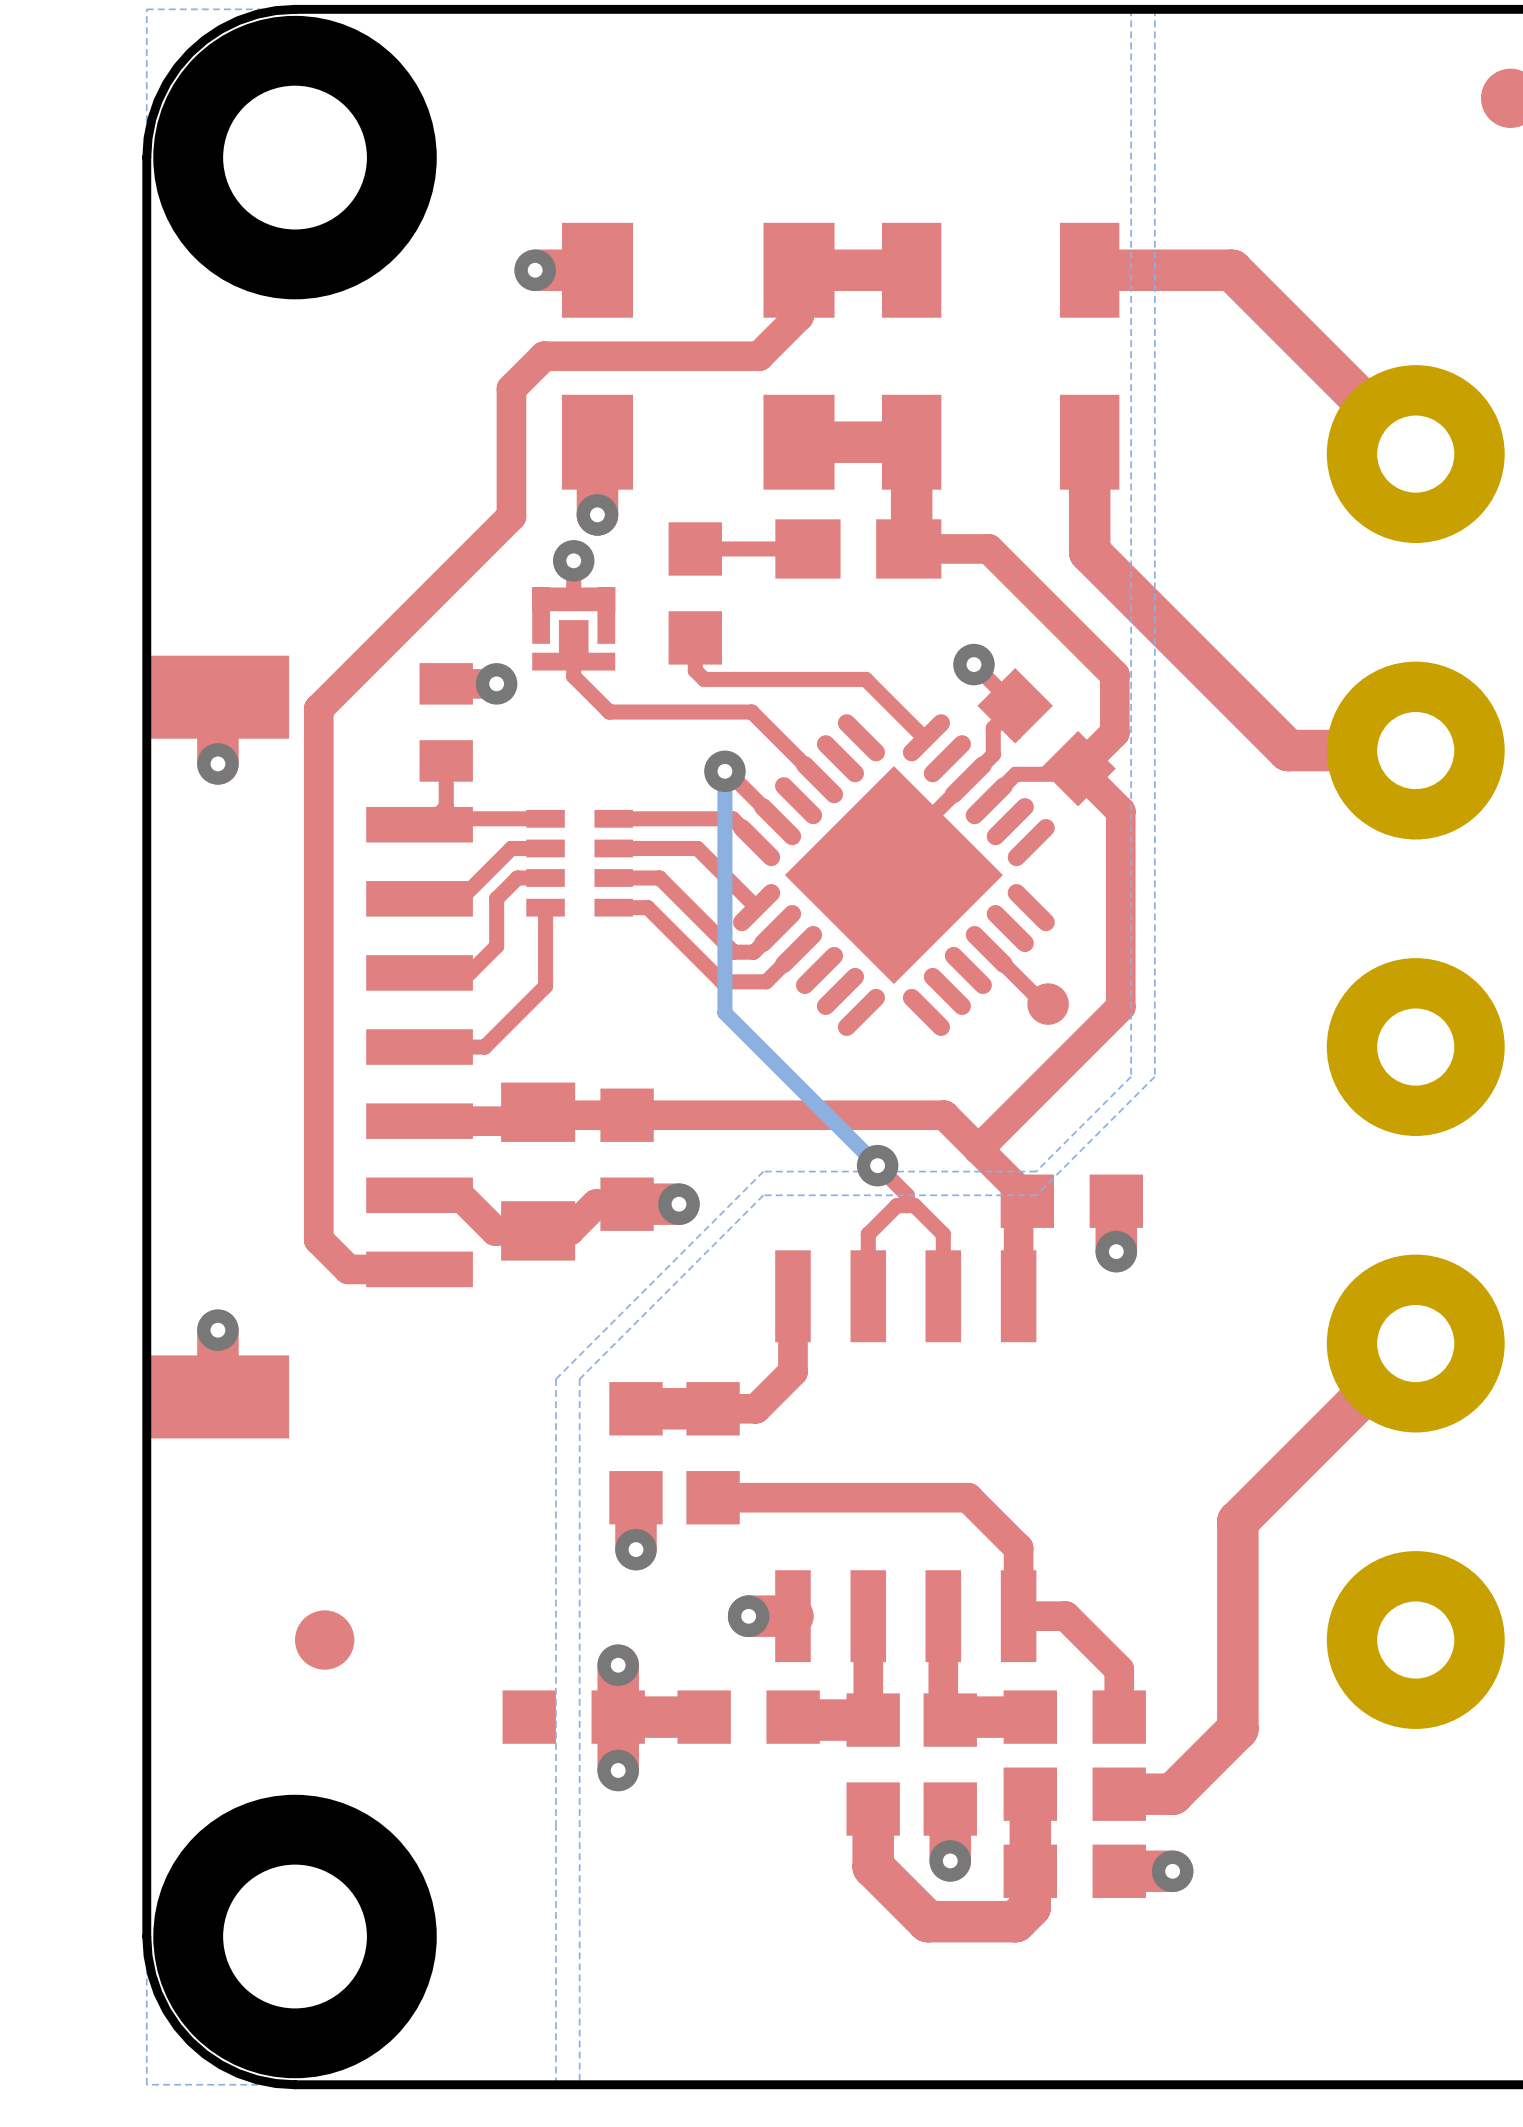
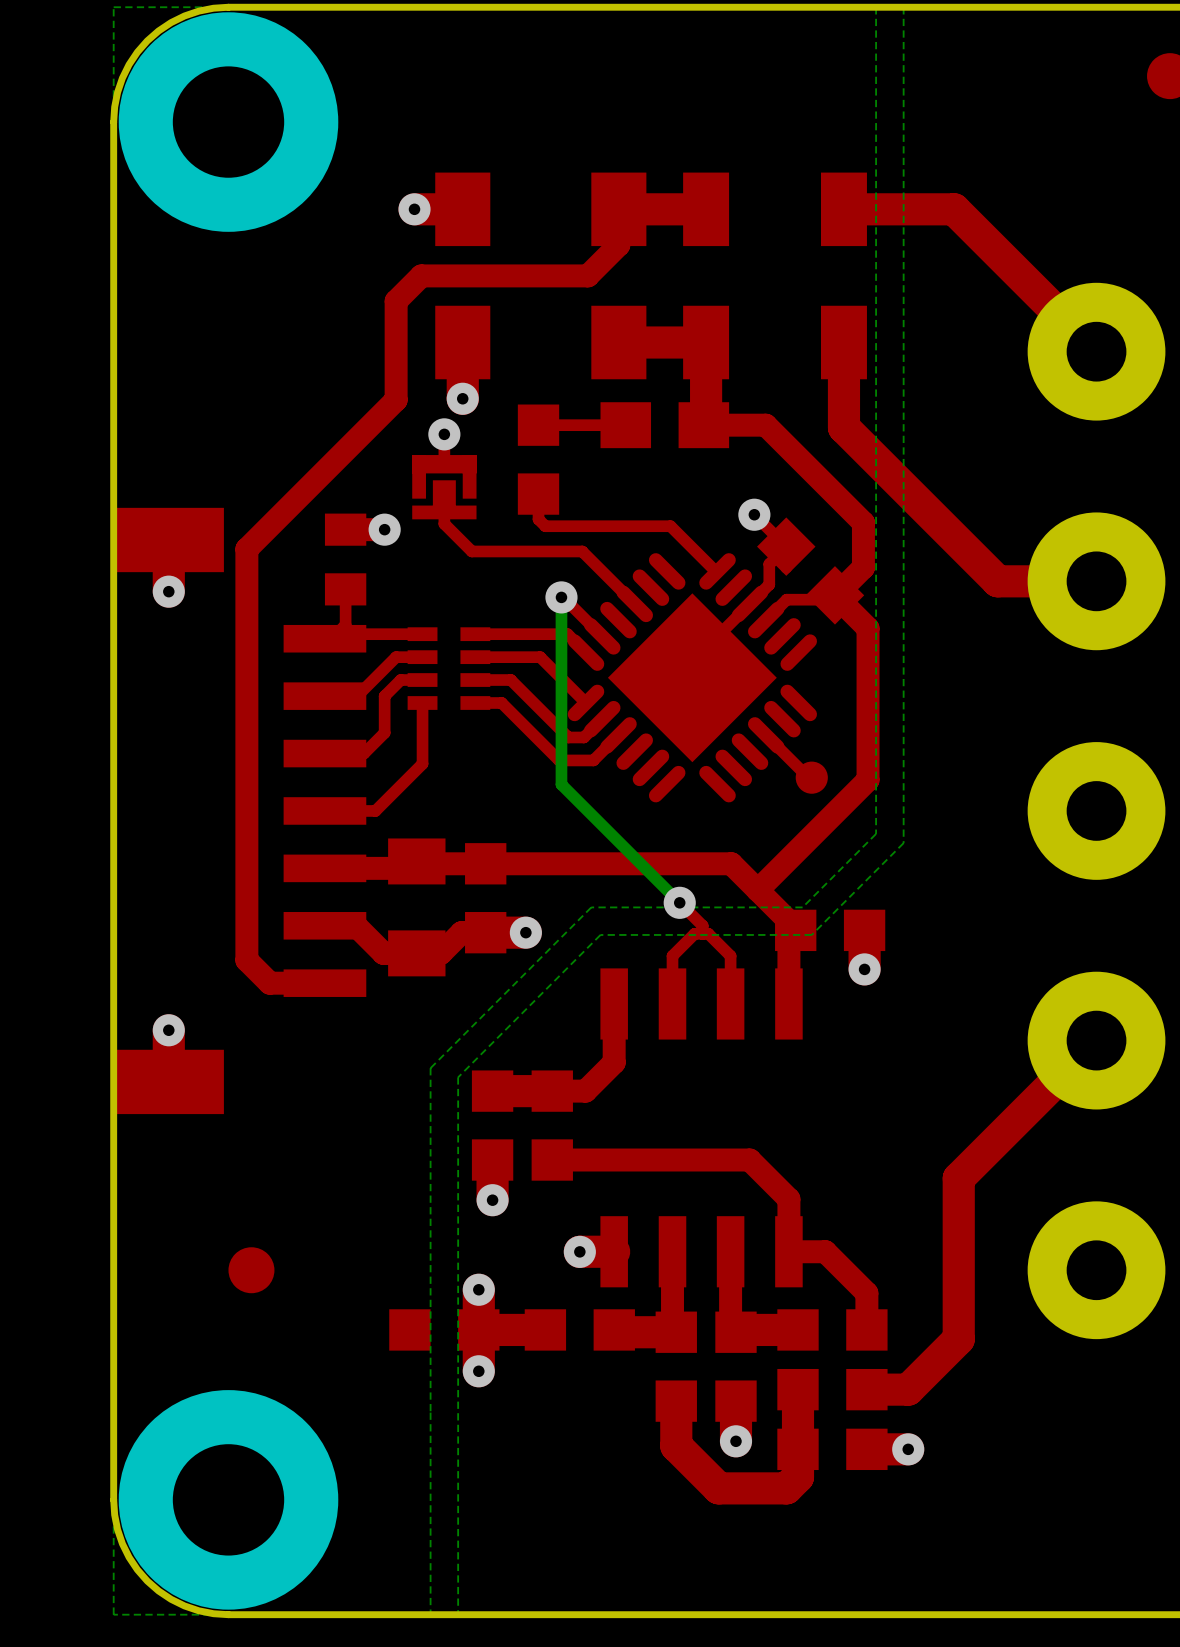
bottom zone outline: (1166, 9) (1154, 9) (1154, 1076) (1036, 1195) (763, 1195) (579, 1379) (579, 2084) (591, 2084) -> (903, 7) (903, 843) (811, 934) (600, 934) (458, 1077) (458, 1614)

